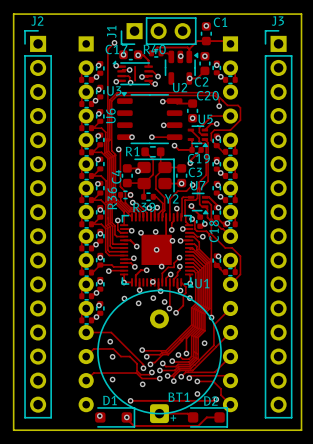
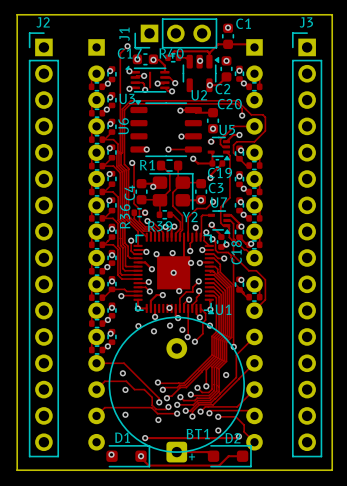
track: (190, 130) (199, 138) (201, 143) (206, 144) (206, 175) (199, 182) (197, 198) (195, 200) (185, 200) (185, 221) -> (206, 232) (204, 235) (205, 242)
via: none -> (211, 141)
via: none -> (206, 232)

